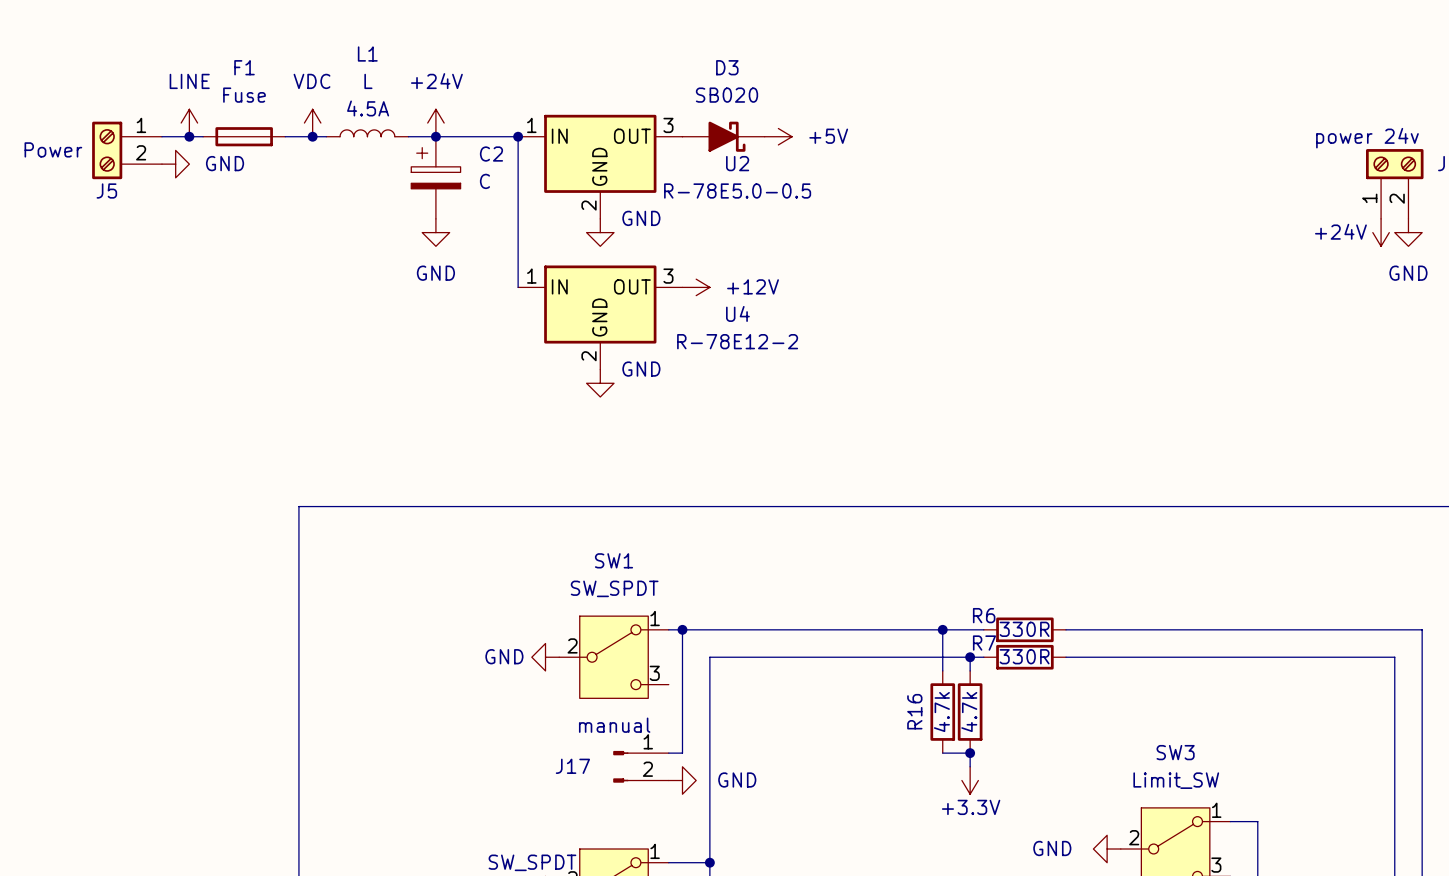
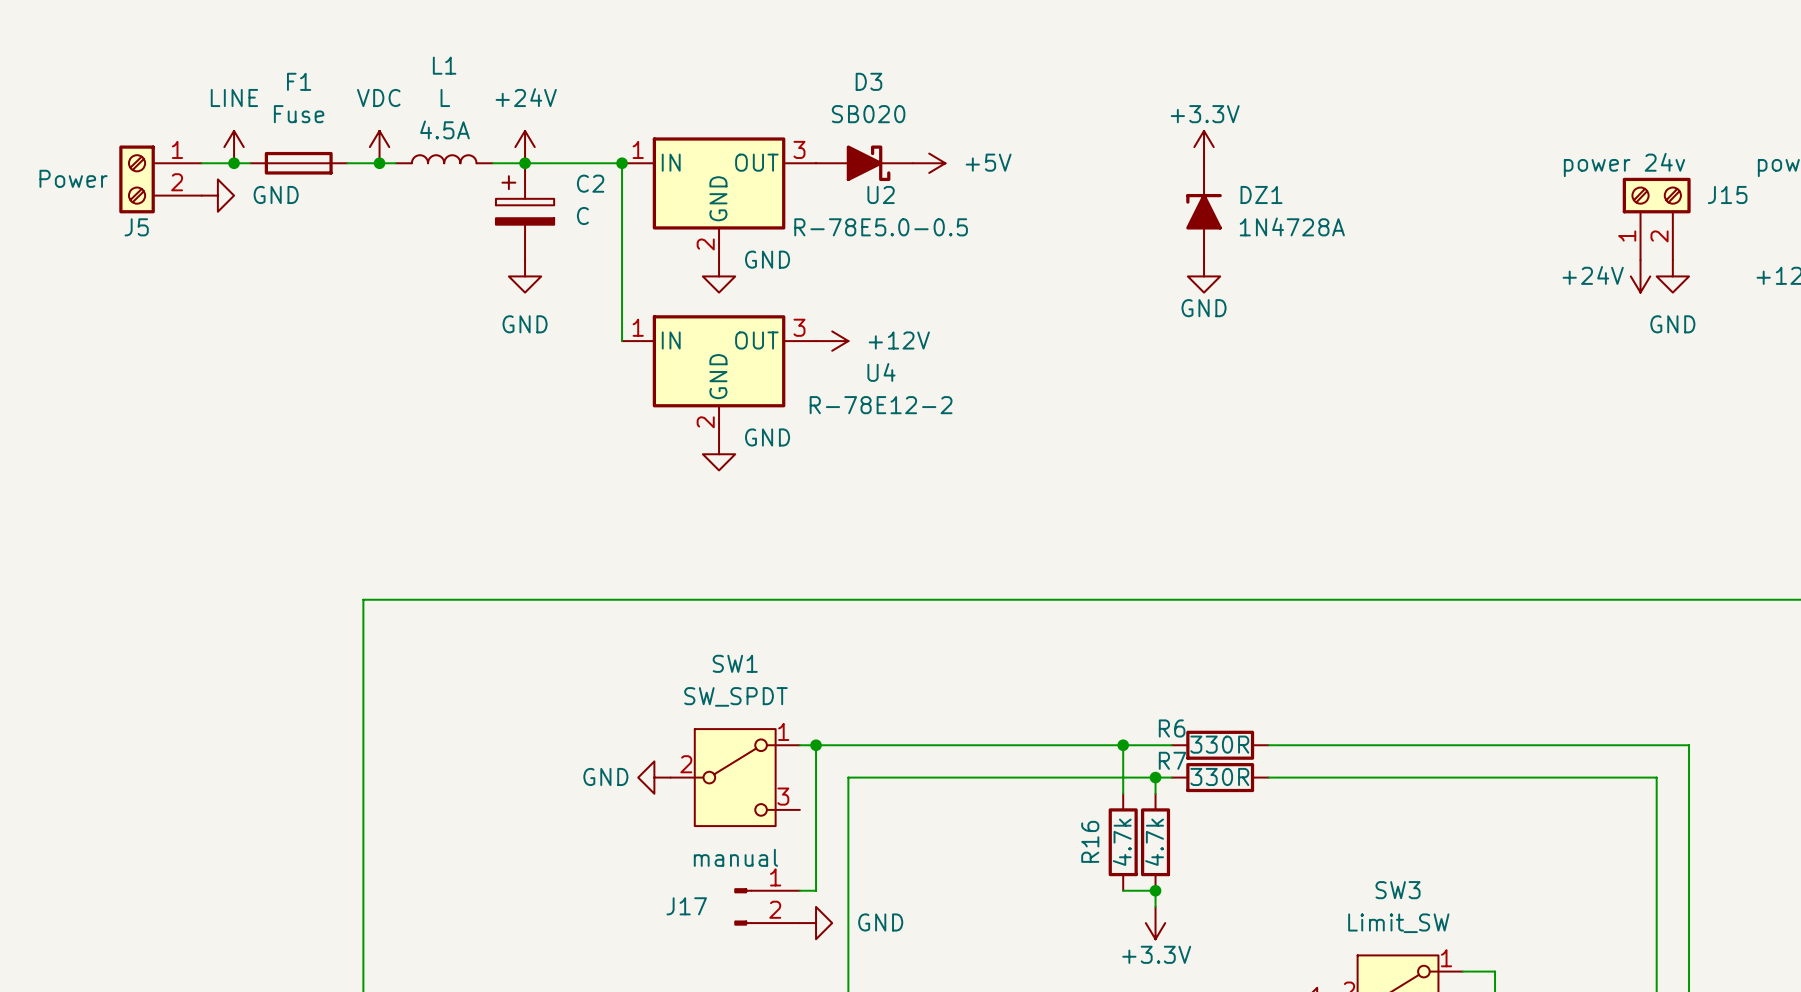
power symbol: none -> +3.3V (1204, 147)
DZ1: none -> 1N4728A (1204, 211)
power symbol: none -> GND (1204, 276)

